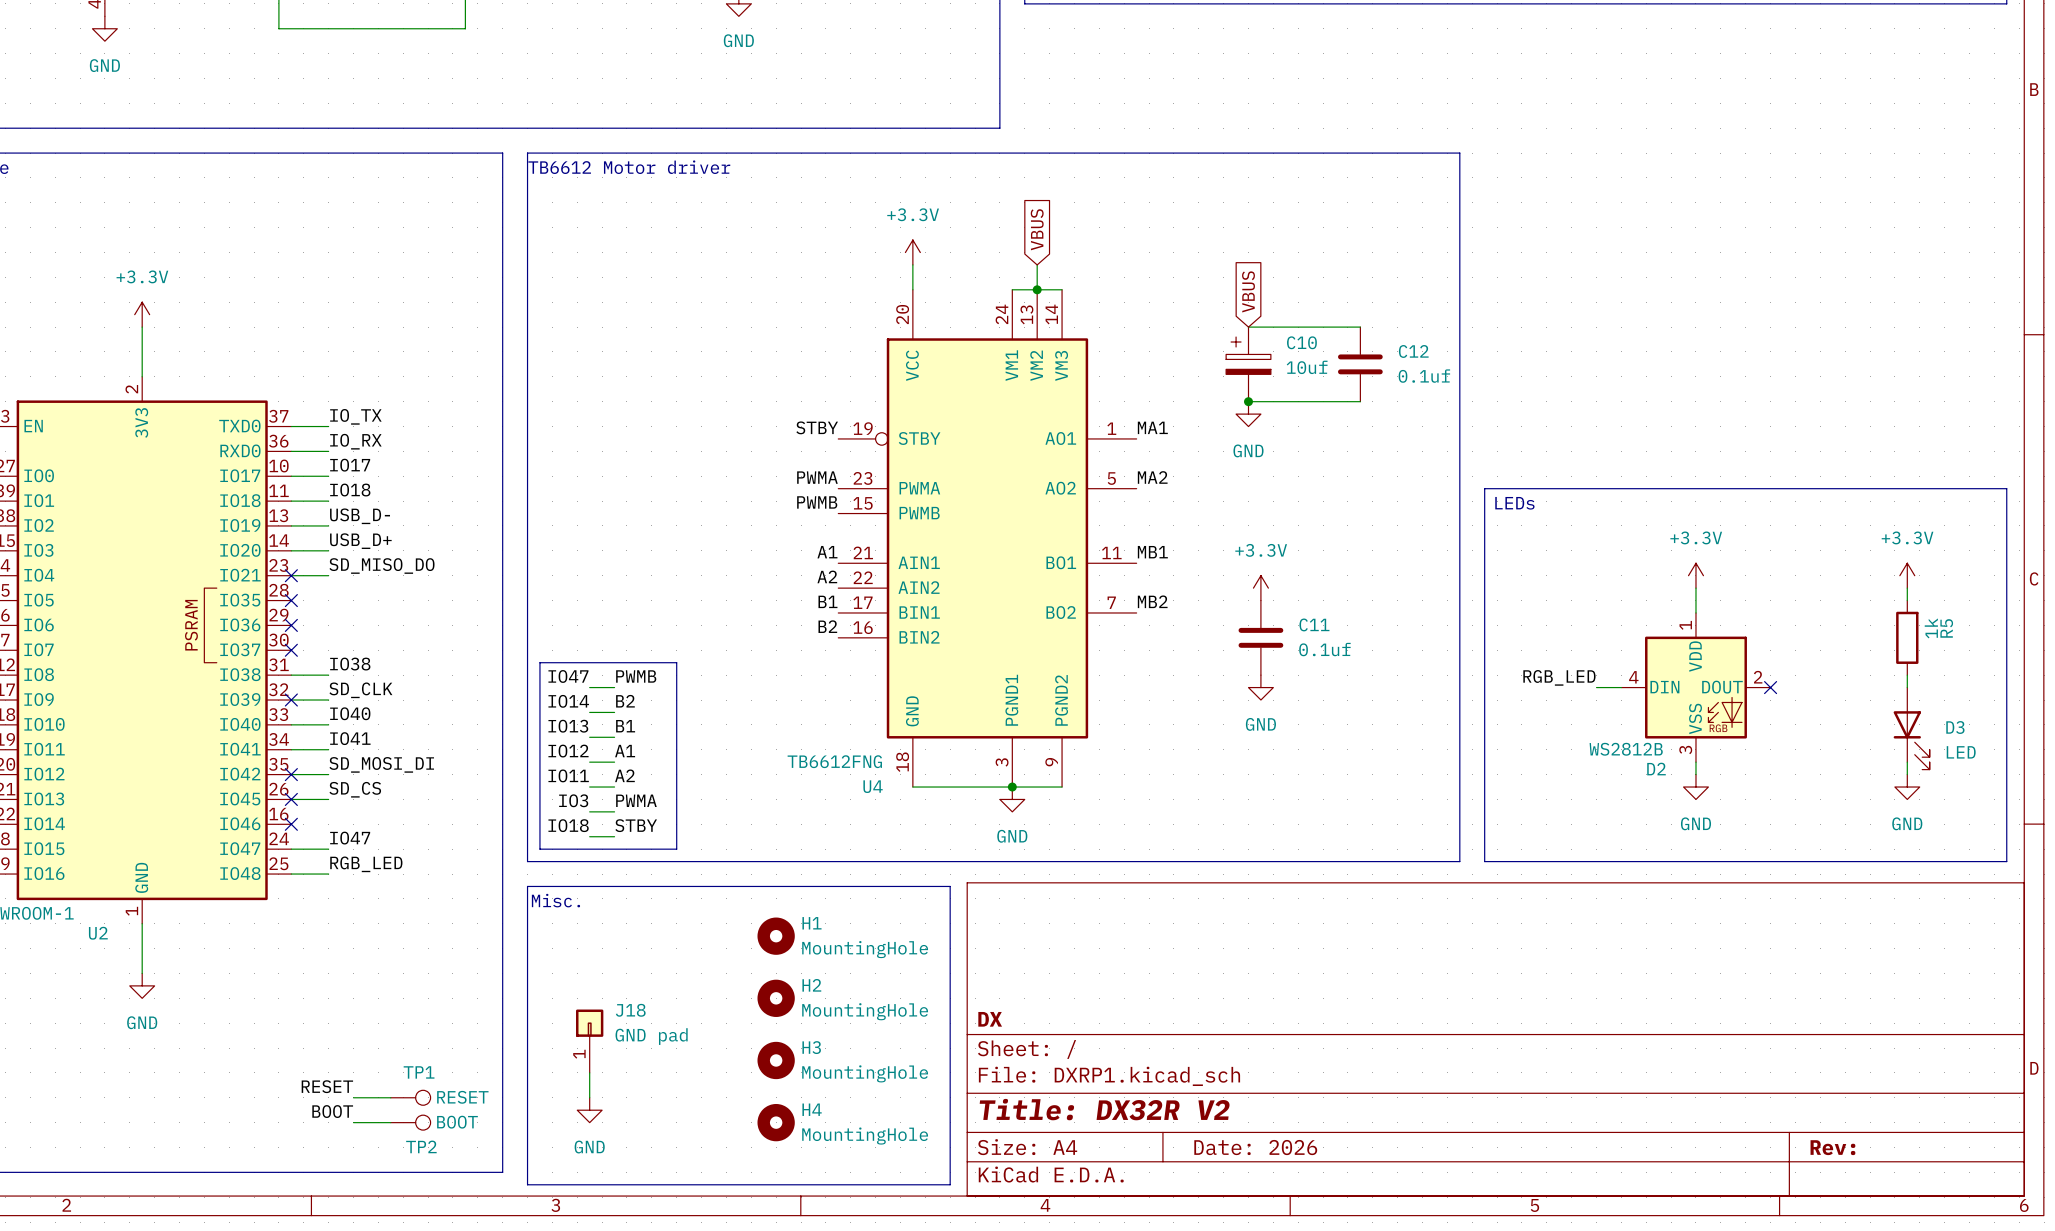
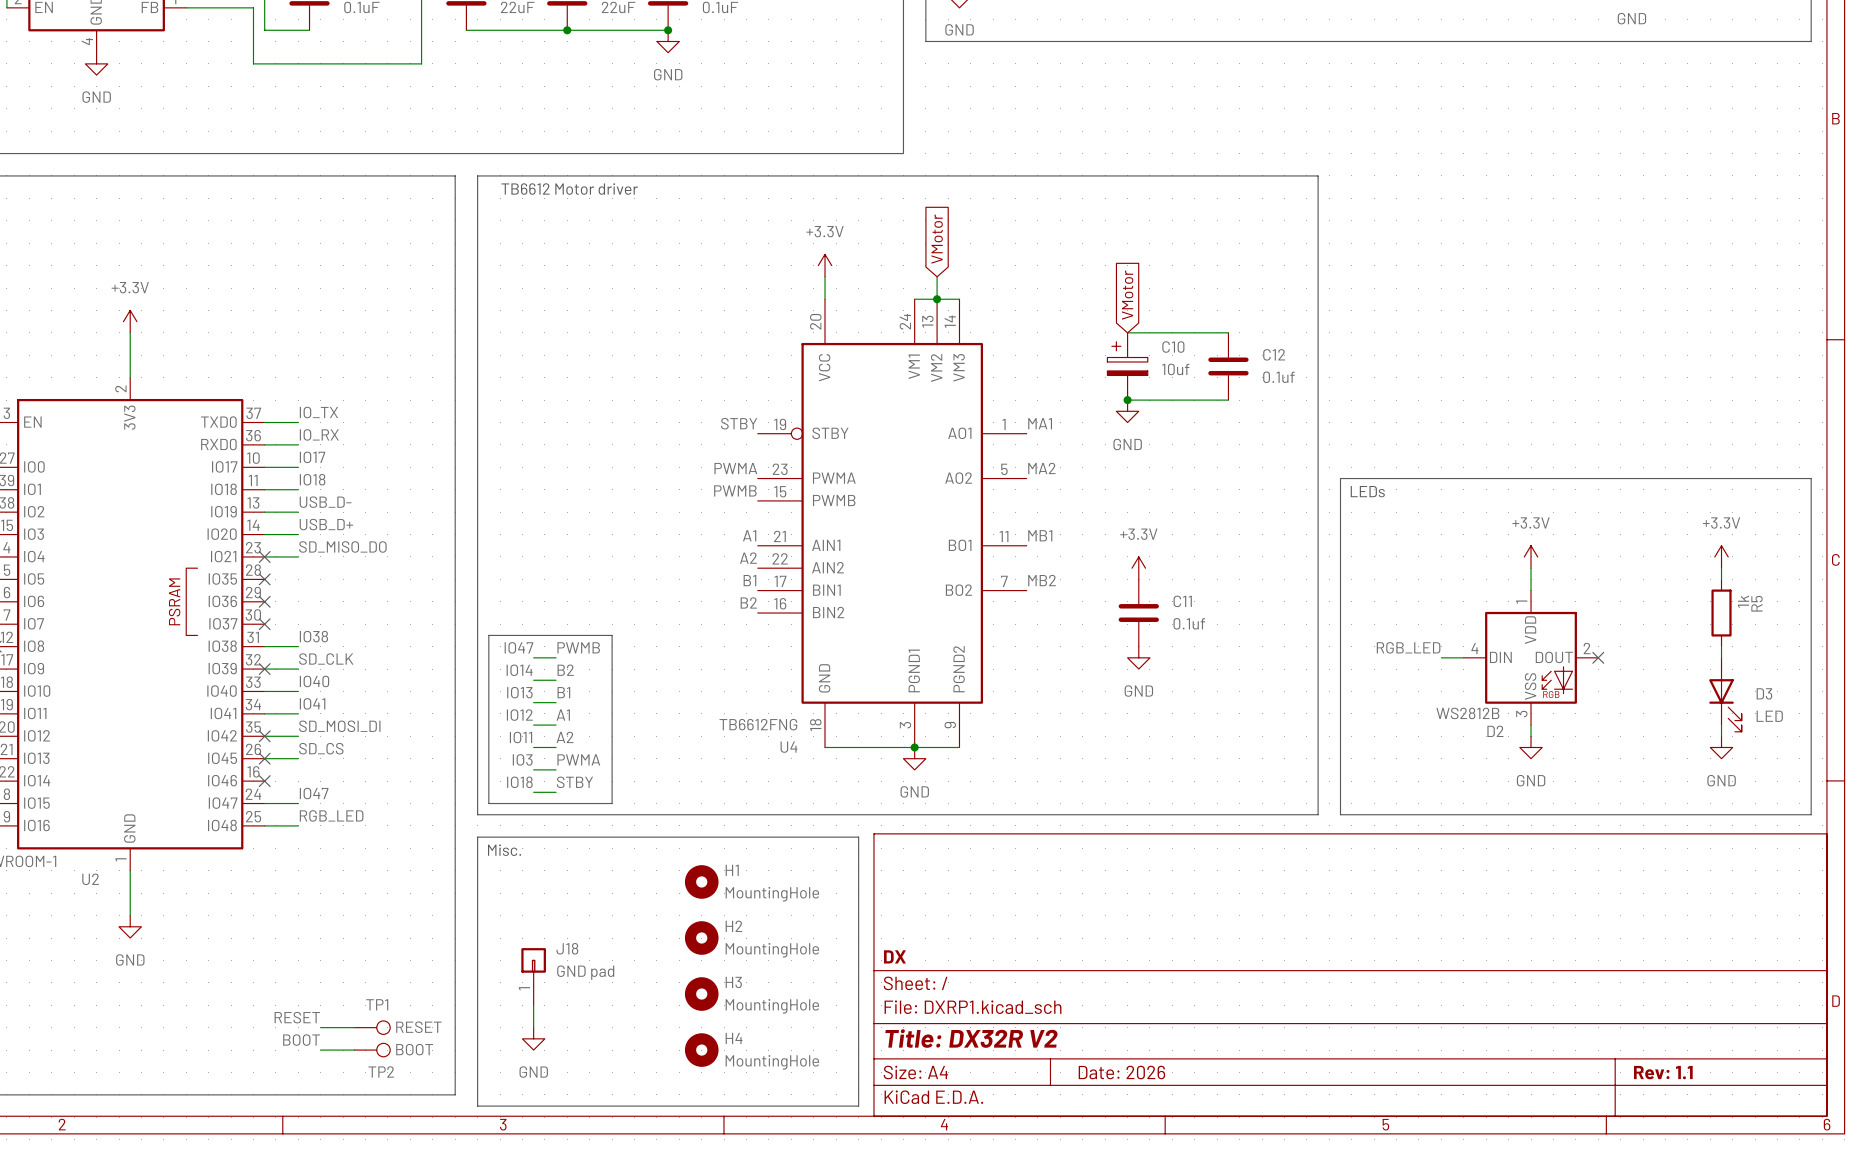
global label: VBUS (1037, 229) -> VMotor (937, 239)
global label: VBUS (1248, 291) -> VMotor (1127, 295)
title block: Rev: (1832, 1147) -> Rev: 1.1 (1663, 1072)

